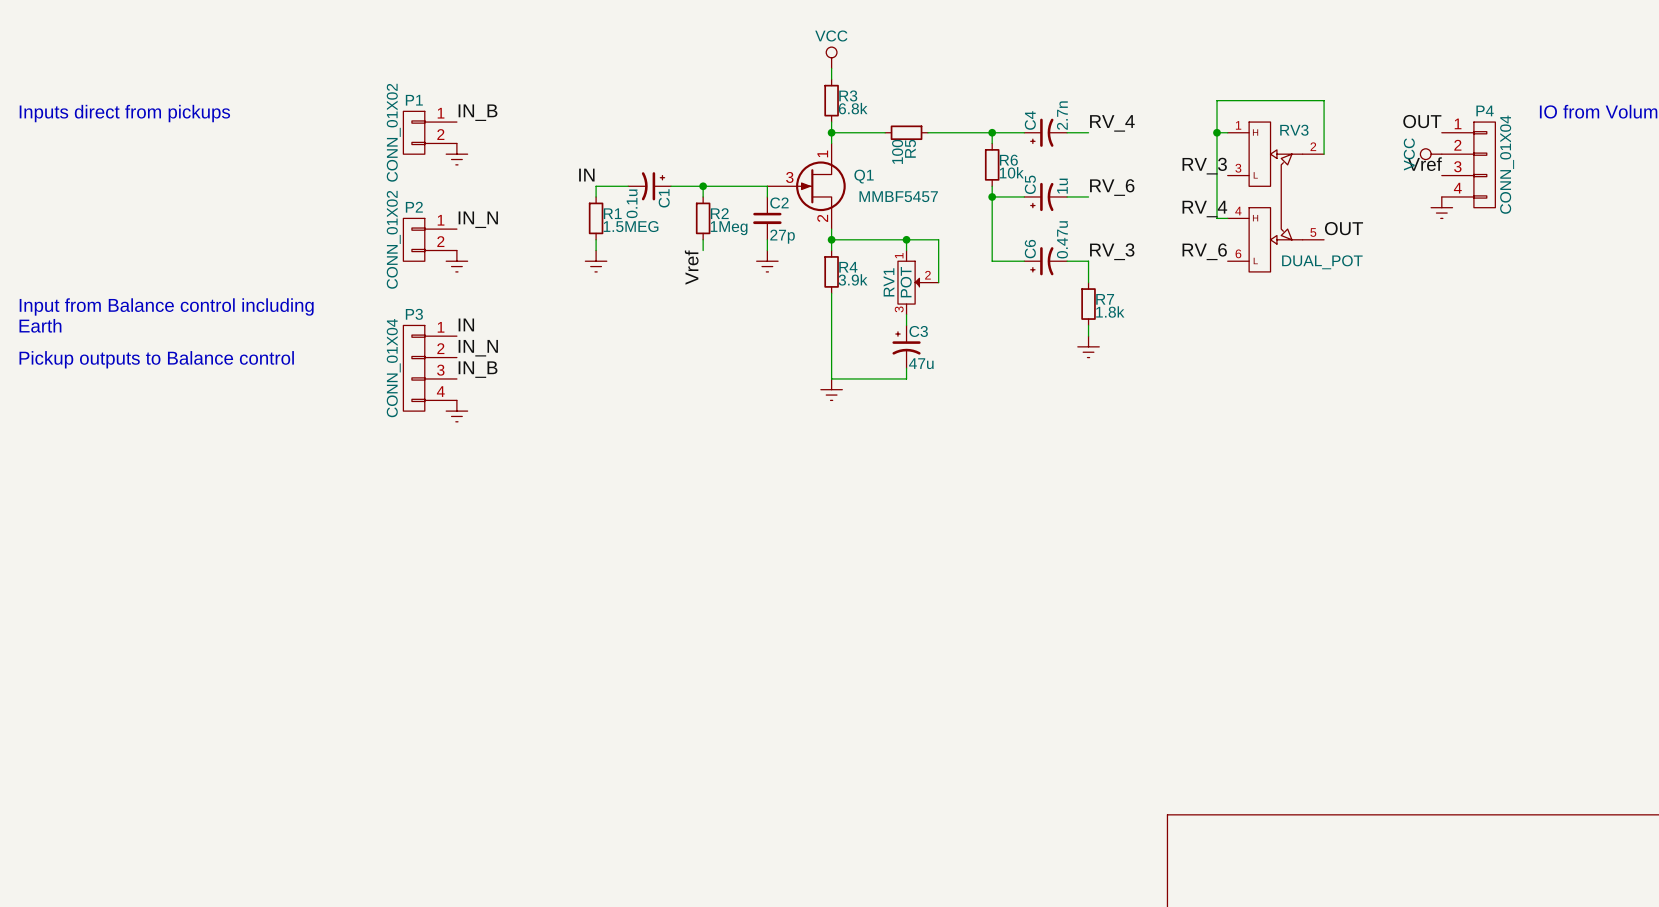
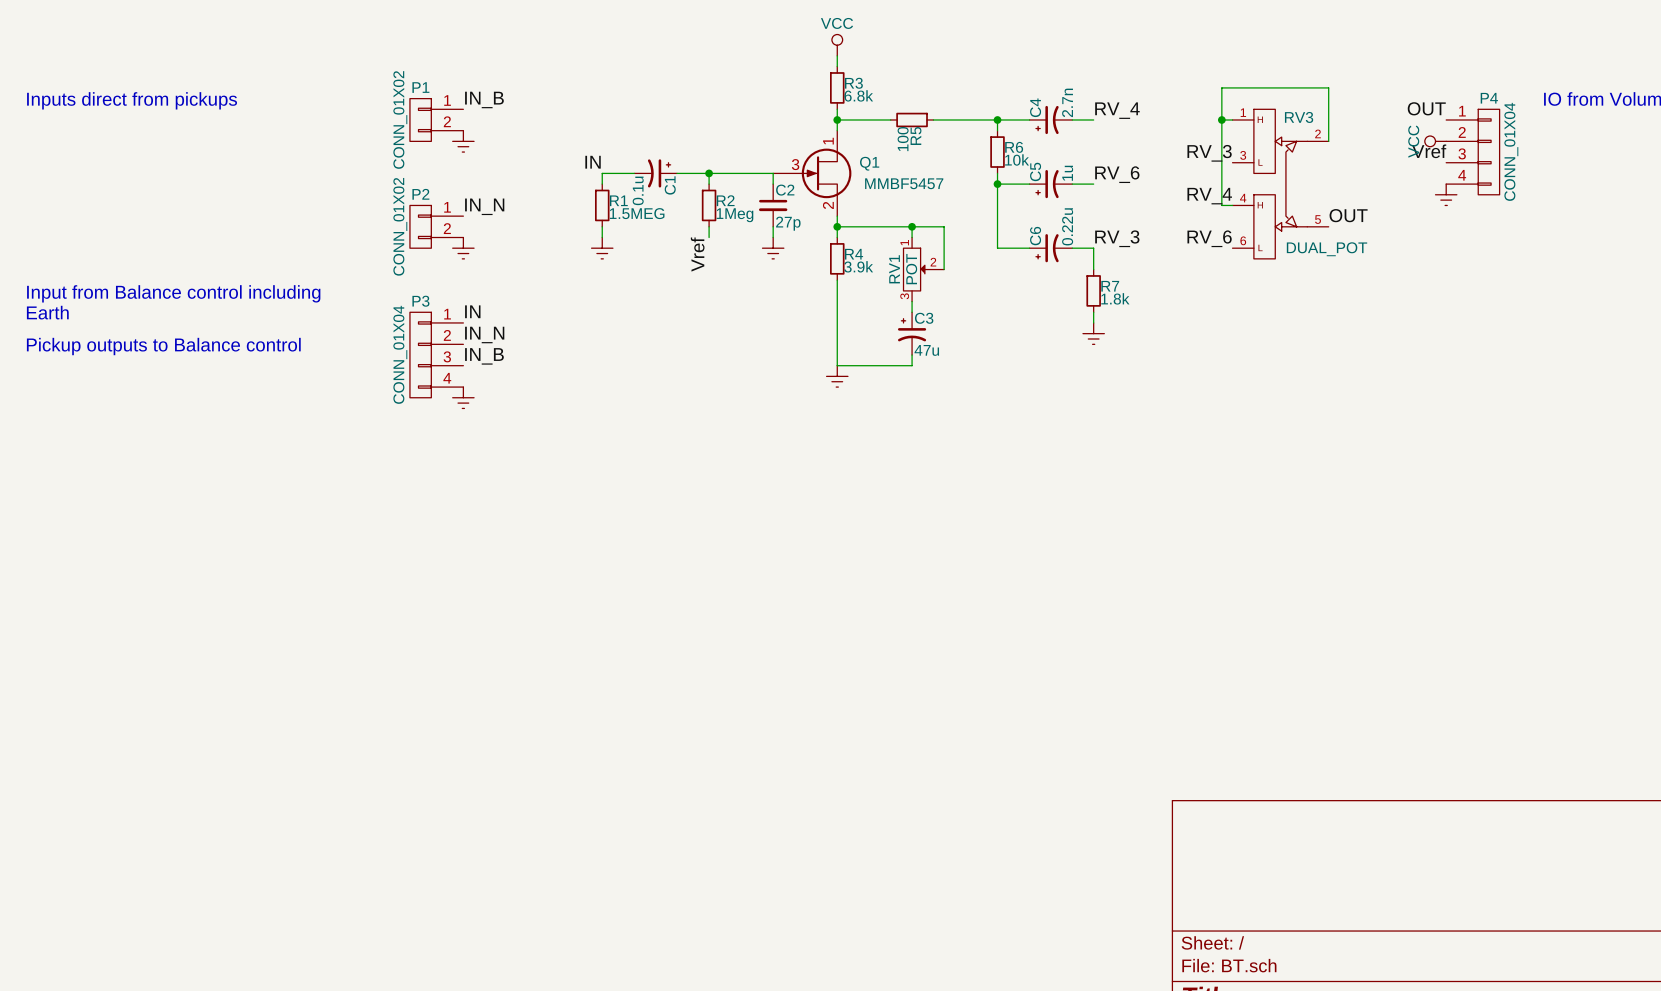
C6 value: 0.47u (1062, 239) -> 0.22u (1067, 226)

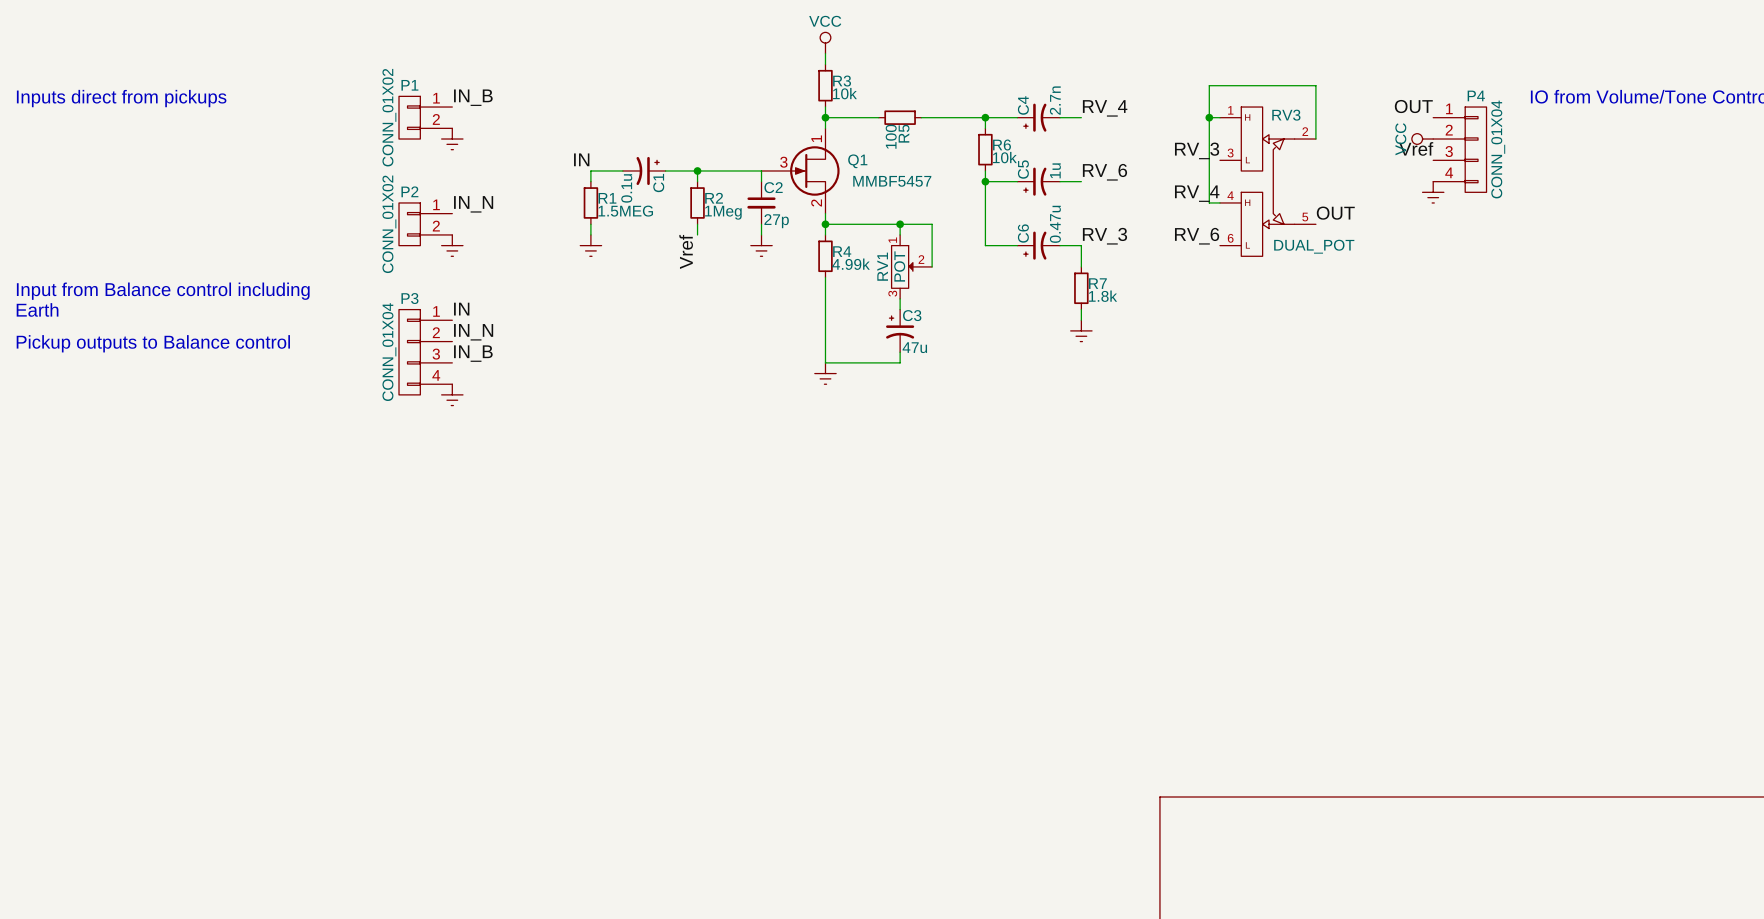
R3 value: 6.8k (858, 95) -> 10k (844, 93)
C6 value: 0.22u (1067, 226) -> 0.47u (1055, 224)
R4 value: 3.9k (858, 266) -> 4.99k (851, 264)

